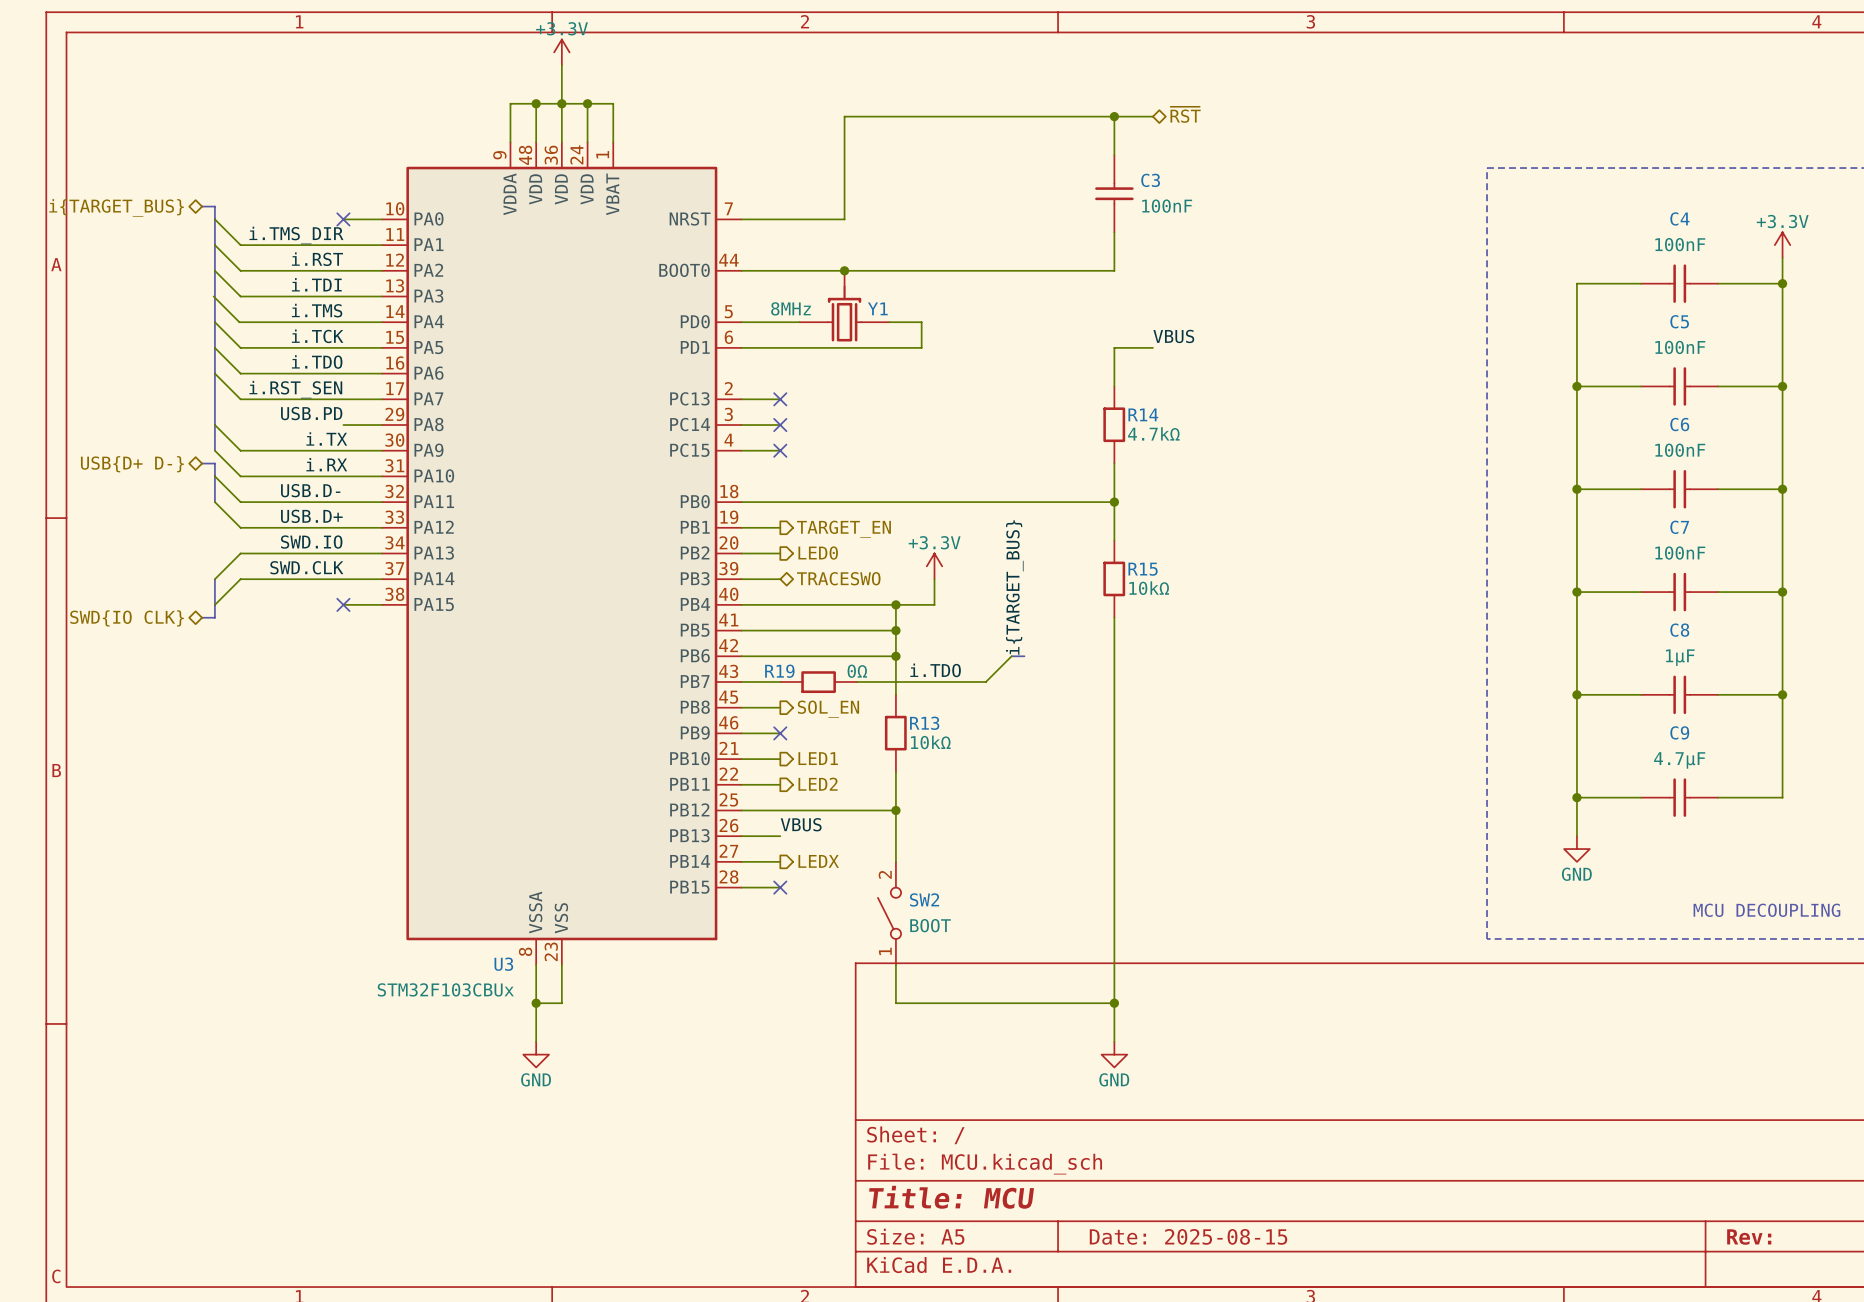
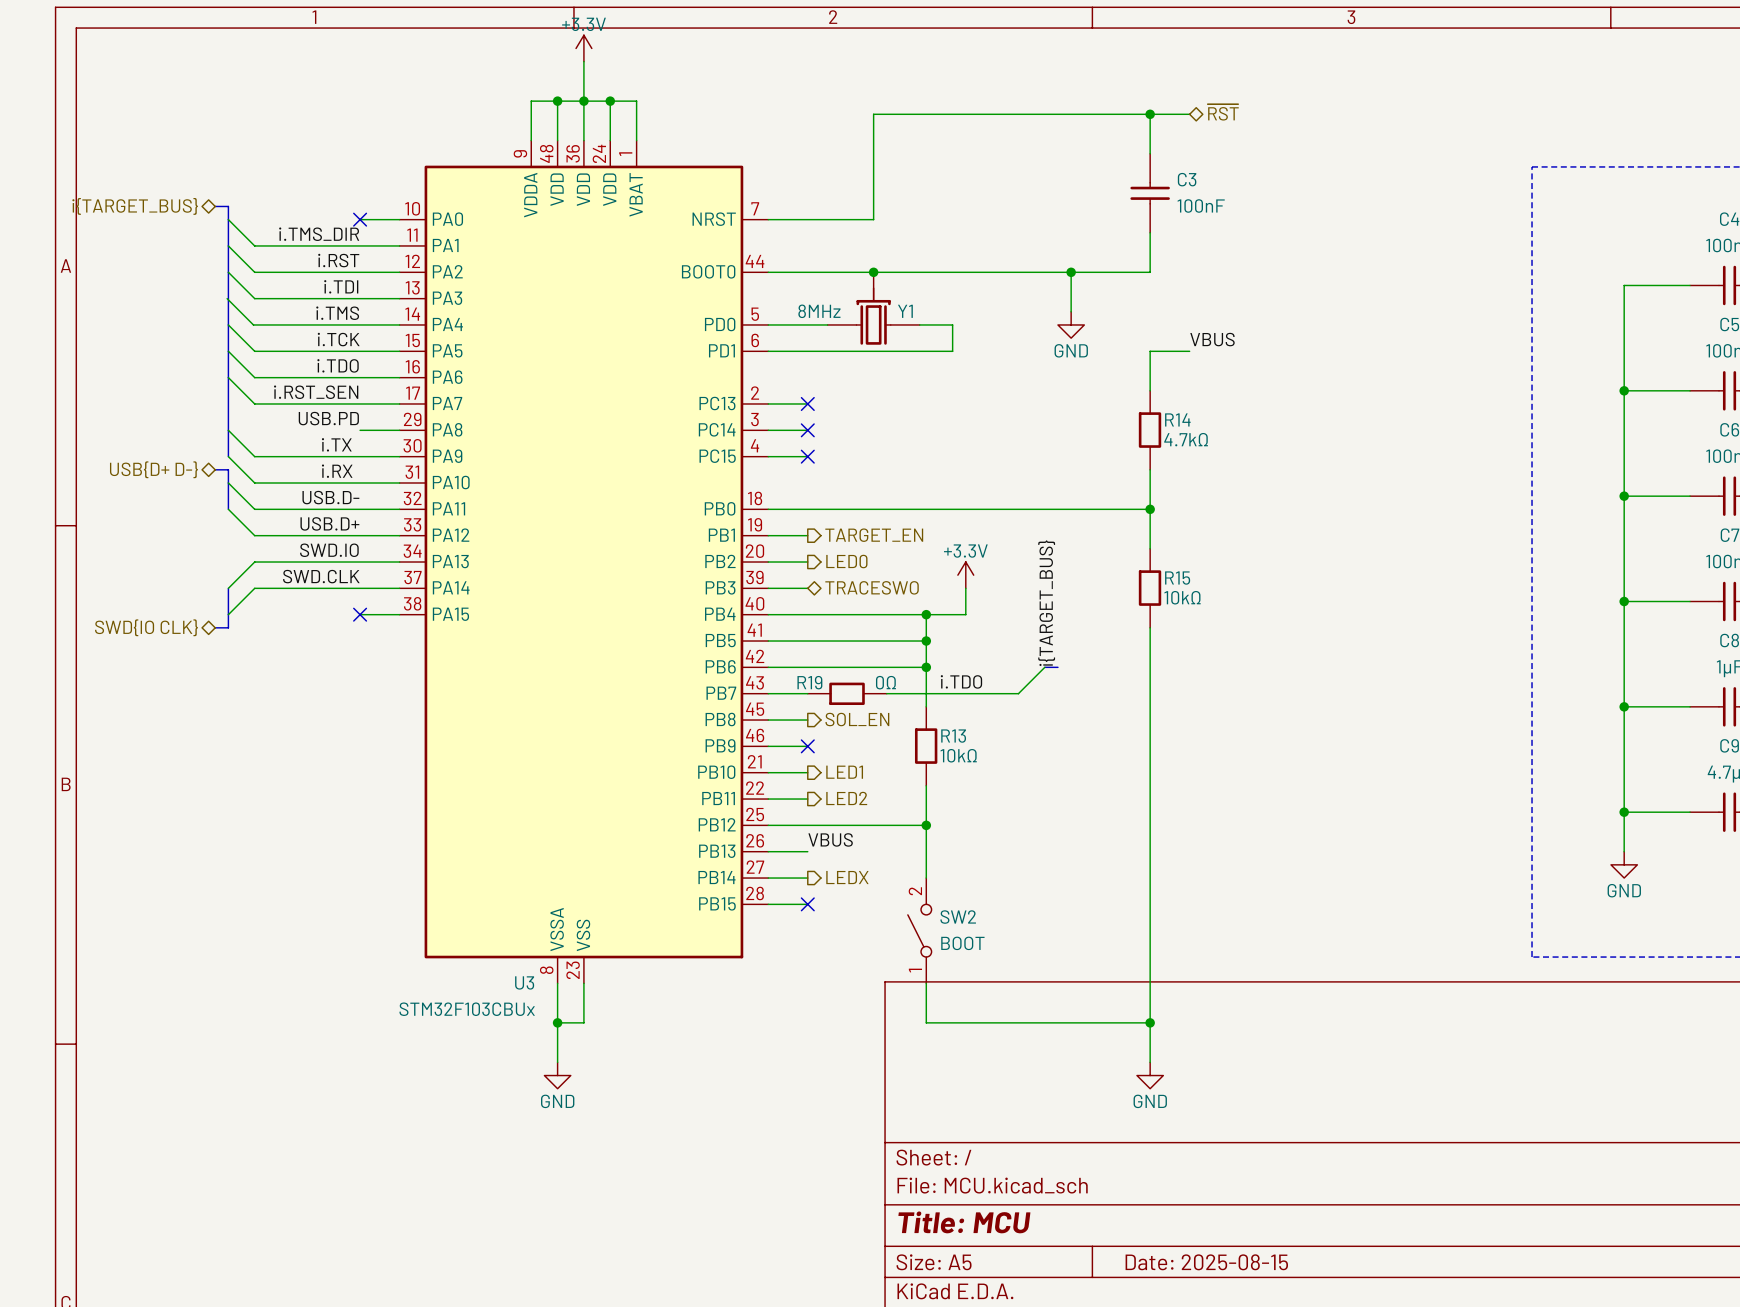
wire: none -> (1071, 272) (1071, 311)
junction: none -> (1071, 272)
power symbol: none -> GND (1071, 324)

